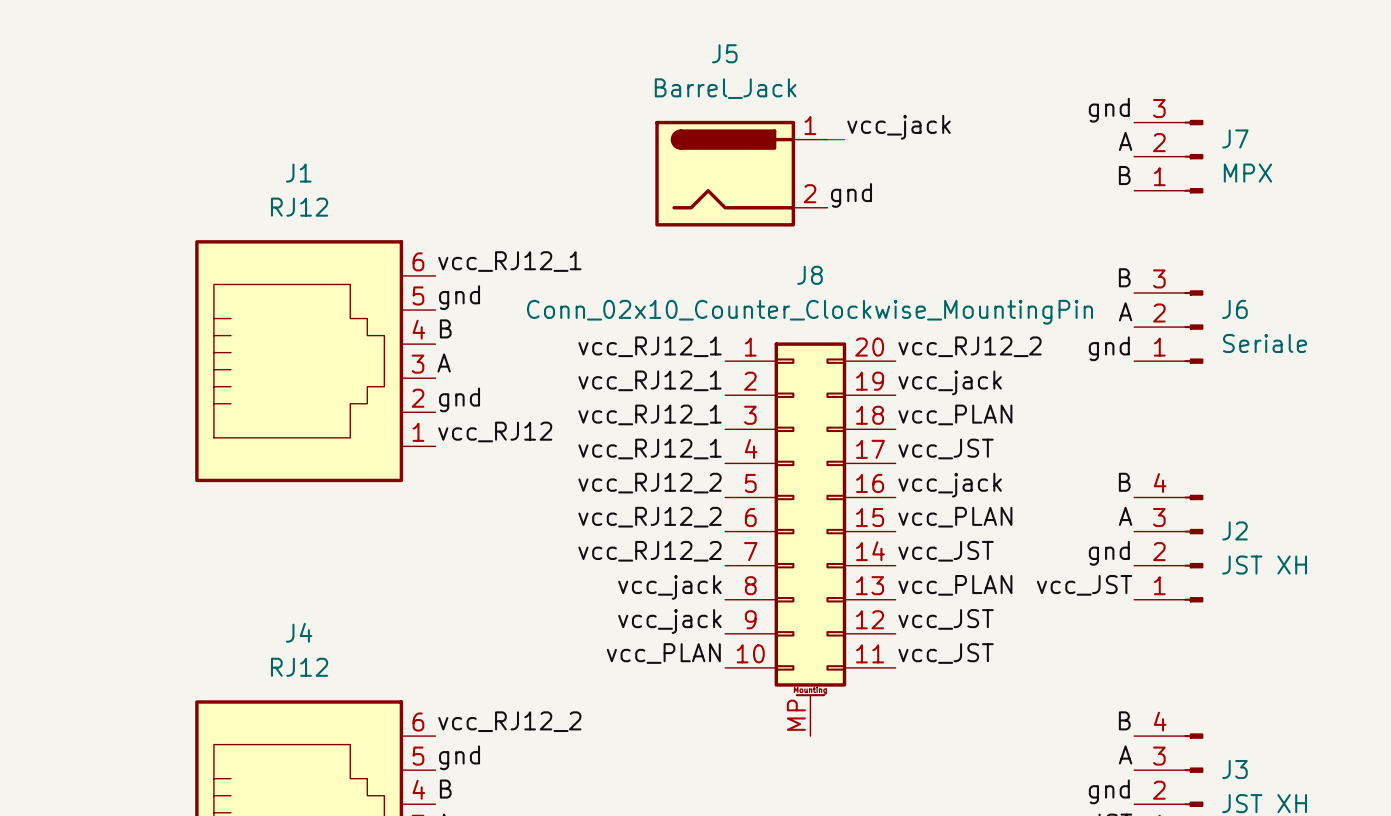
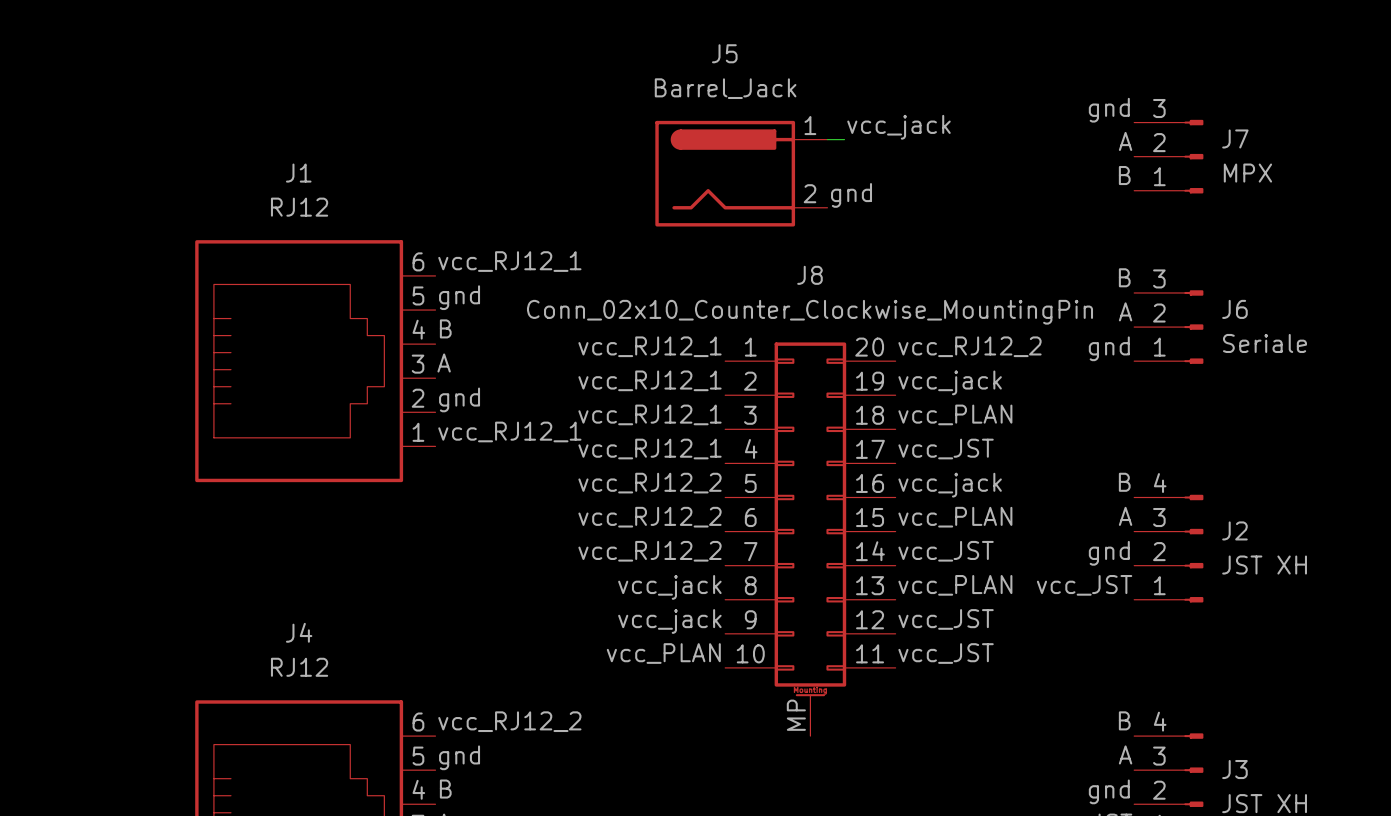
label: vcc_RJ12 (495, 431) -> vcc_RJ12_1 (509, 431)

